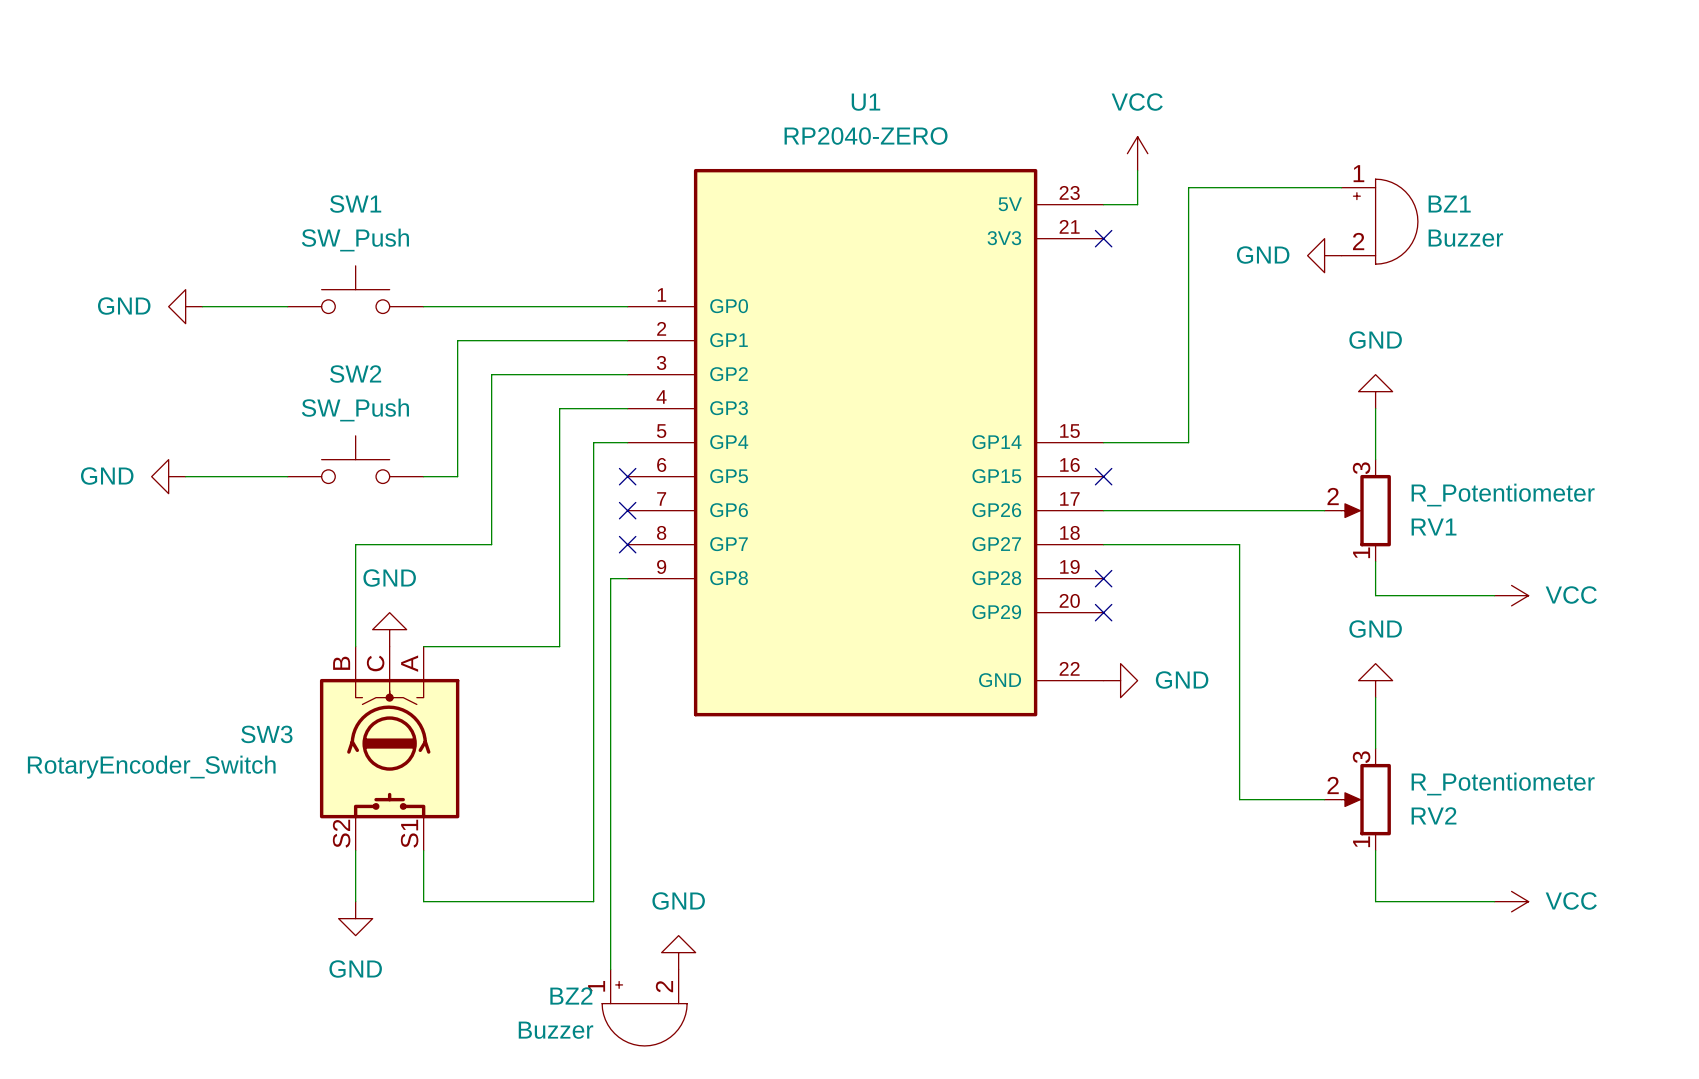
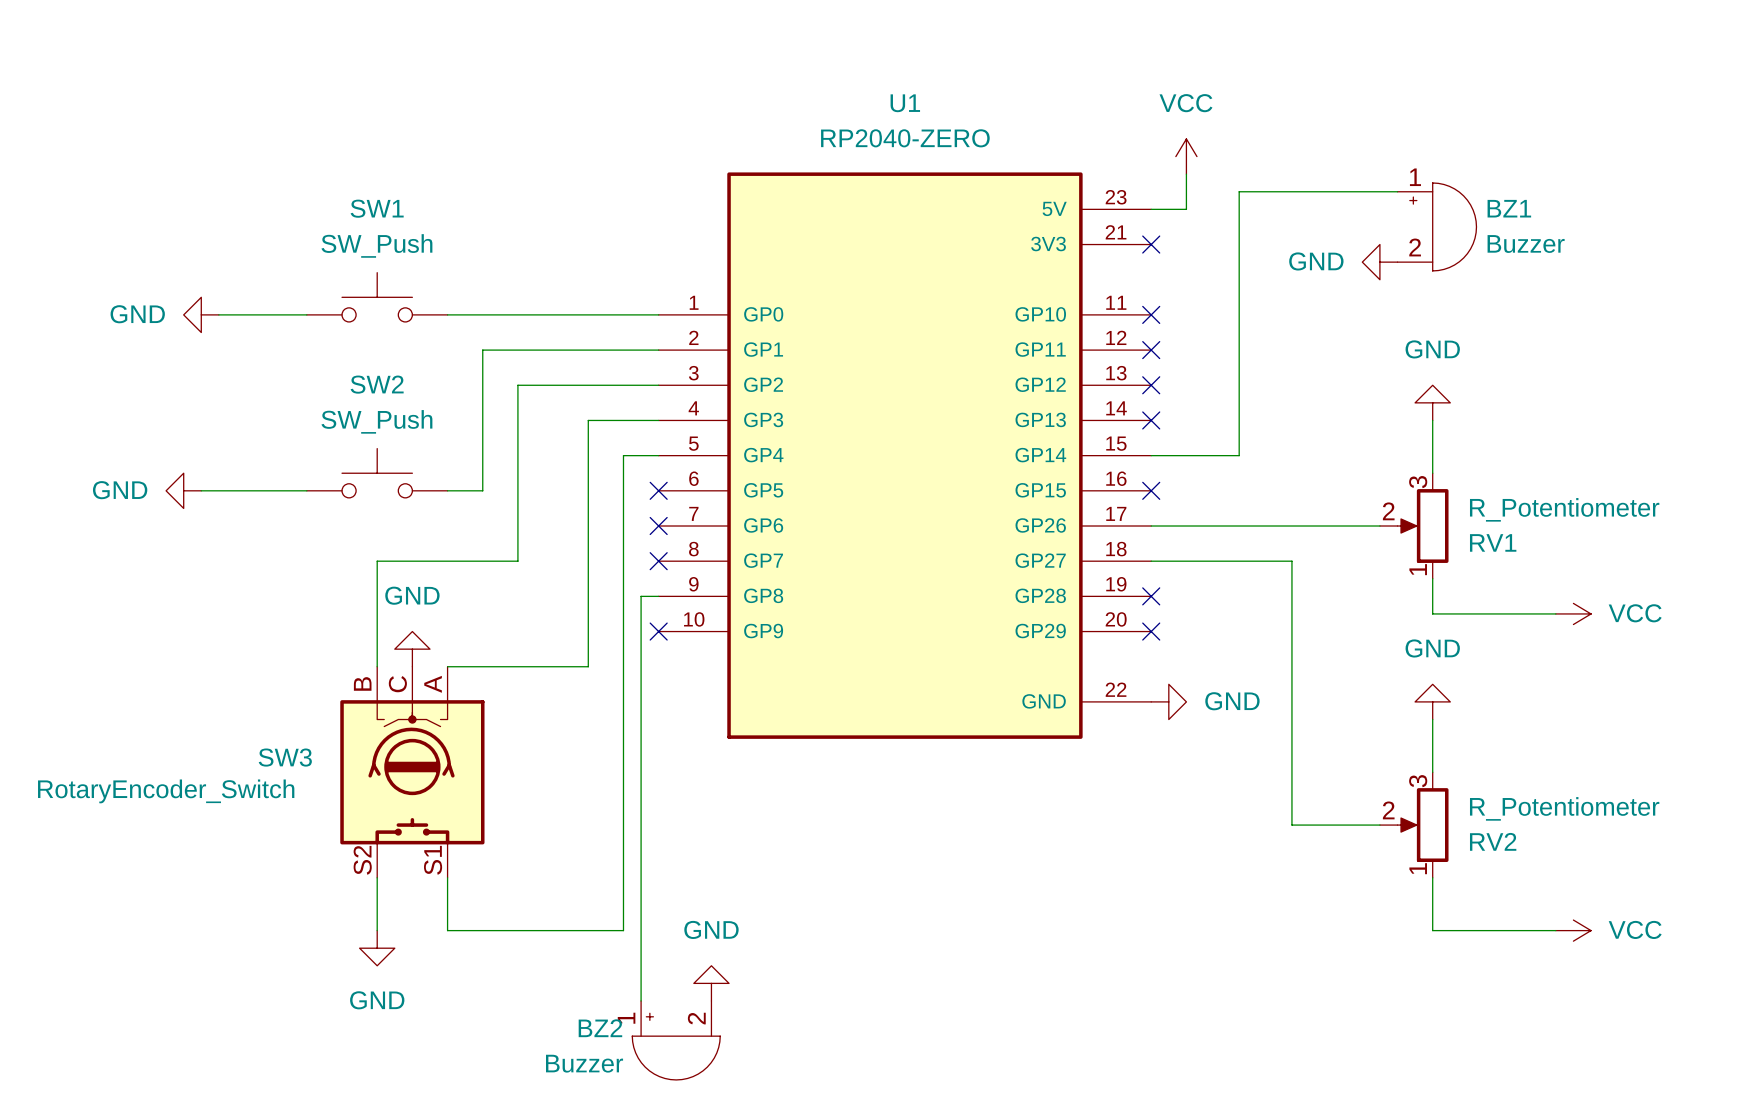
U1 symbol: [627, 168, 1104, 717] -> [658, 172, 1152, 739]
no-connect mark: none -> (1151, 314)
no-connect mark: none -> (1151, 350)
no-connect mark: none -> (1151, 385)
no-connect mark: none -> (1151, 420)
no-connect mark: none -> (658, 631)

